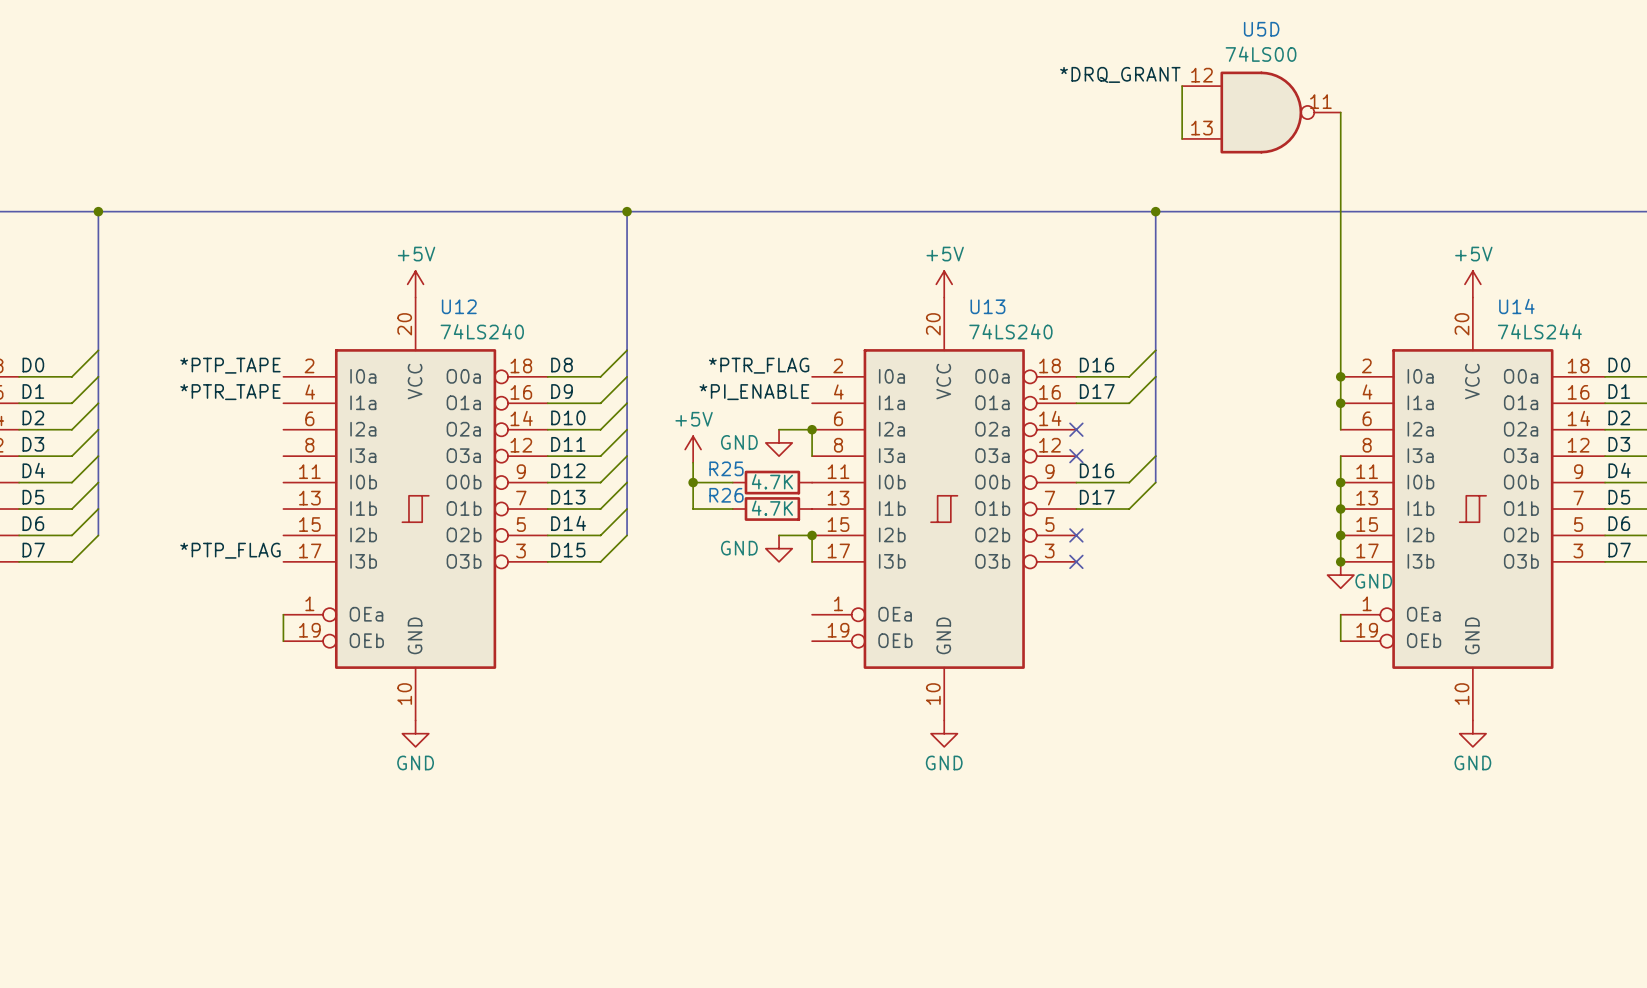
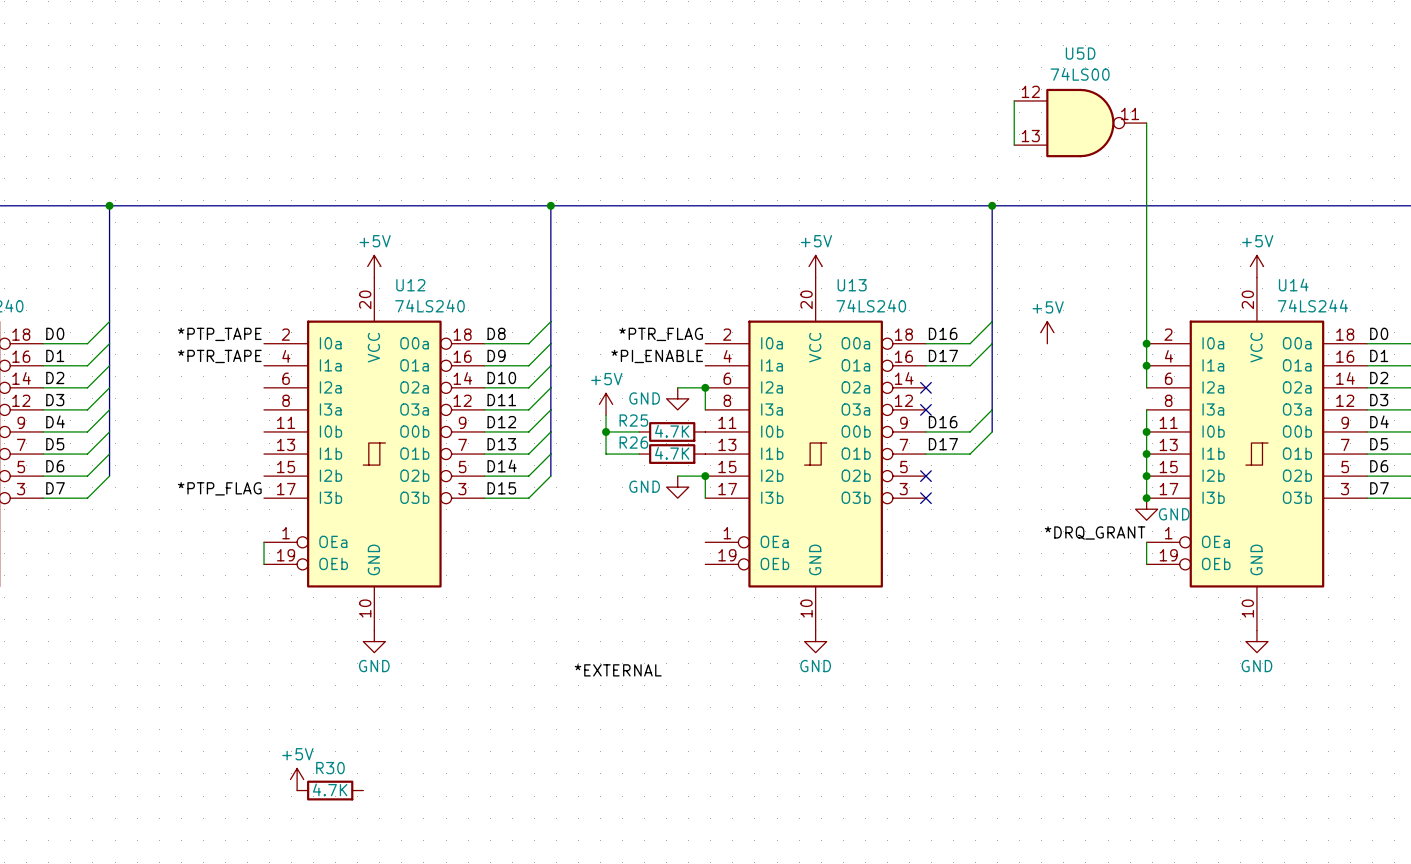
label: *DRQ_GRANT (1120, 74) -> none
power symbol: none -> +5V (1047, 332)
label: none -> *DRQ_GRANT (1095, 532)
label: none -> *EXTERNAL (618, 670)
power symbol: none -> +5V (297, 779)
R30: none -> 4.7K (330, 790)

